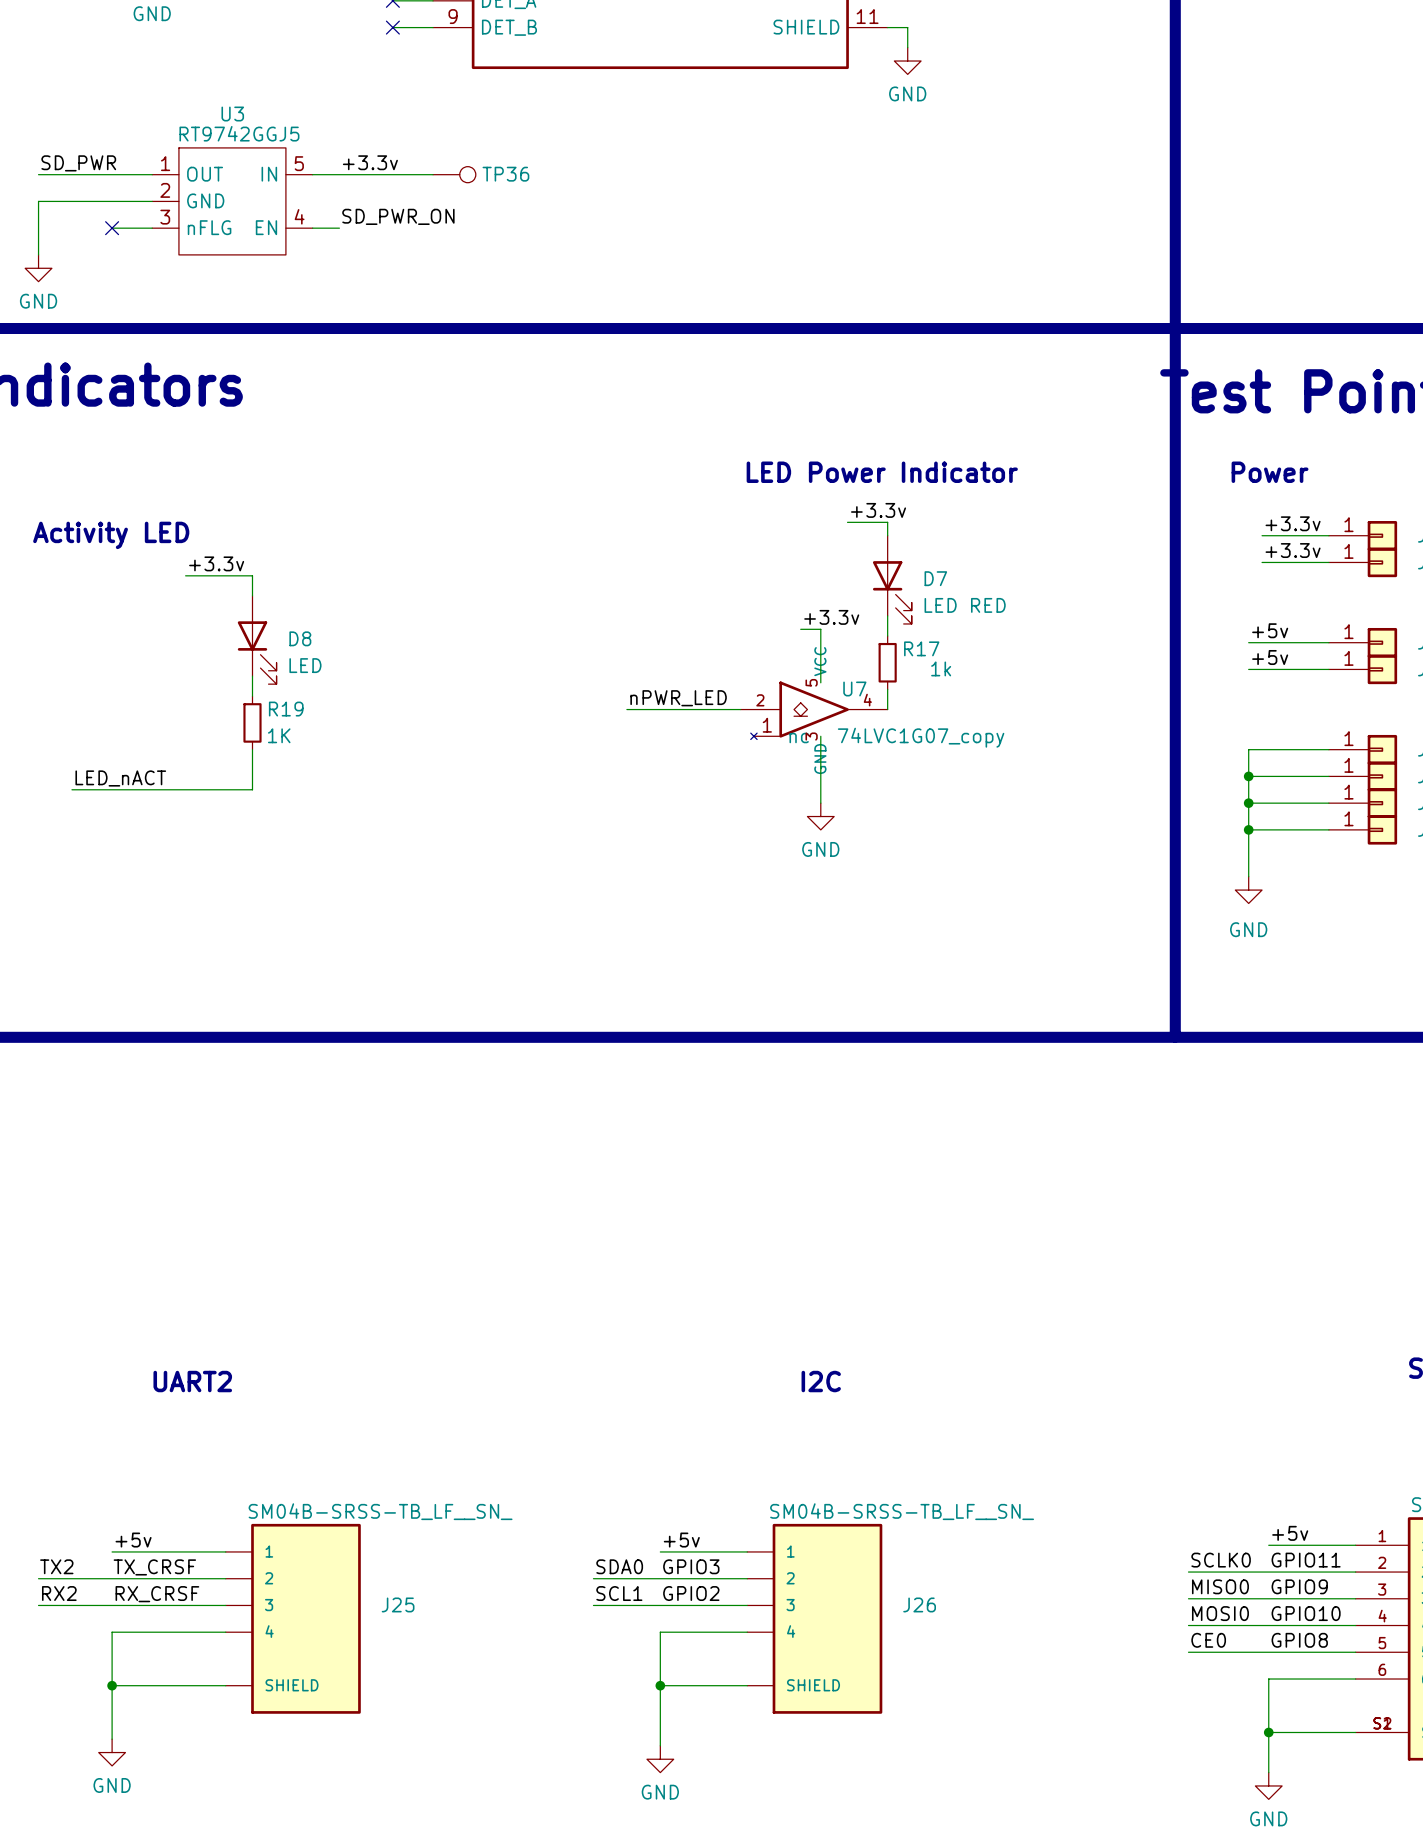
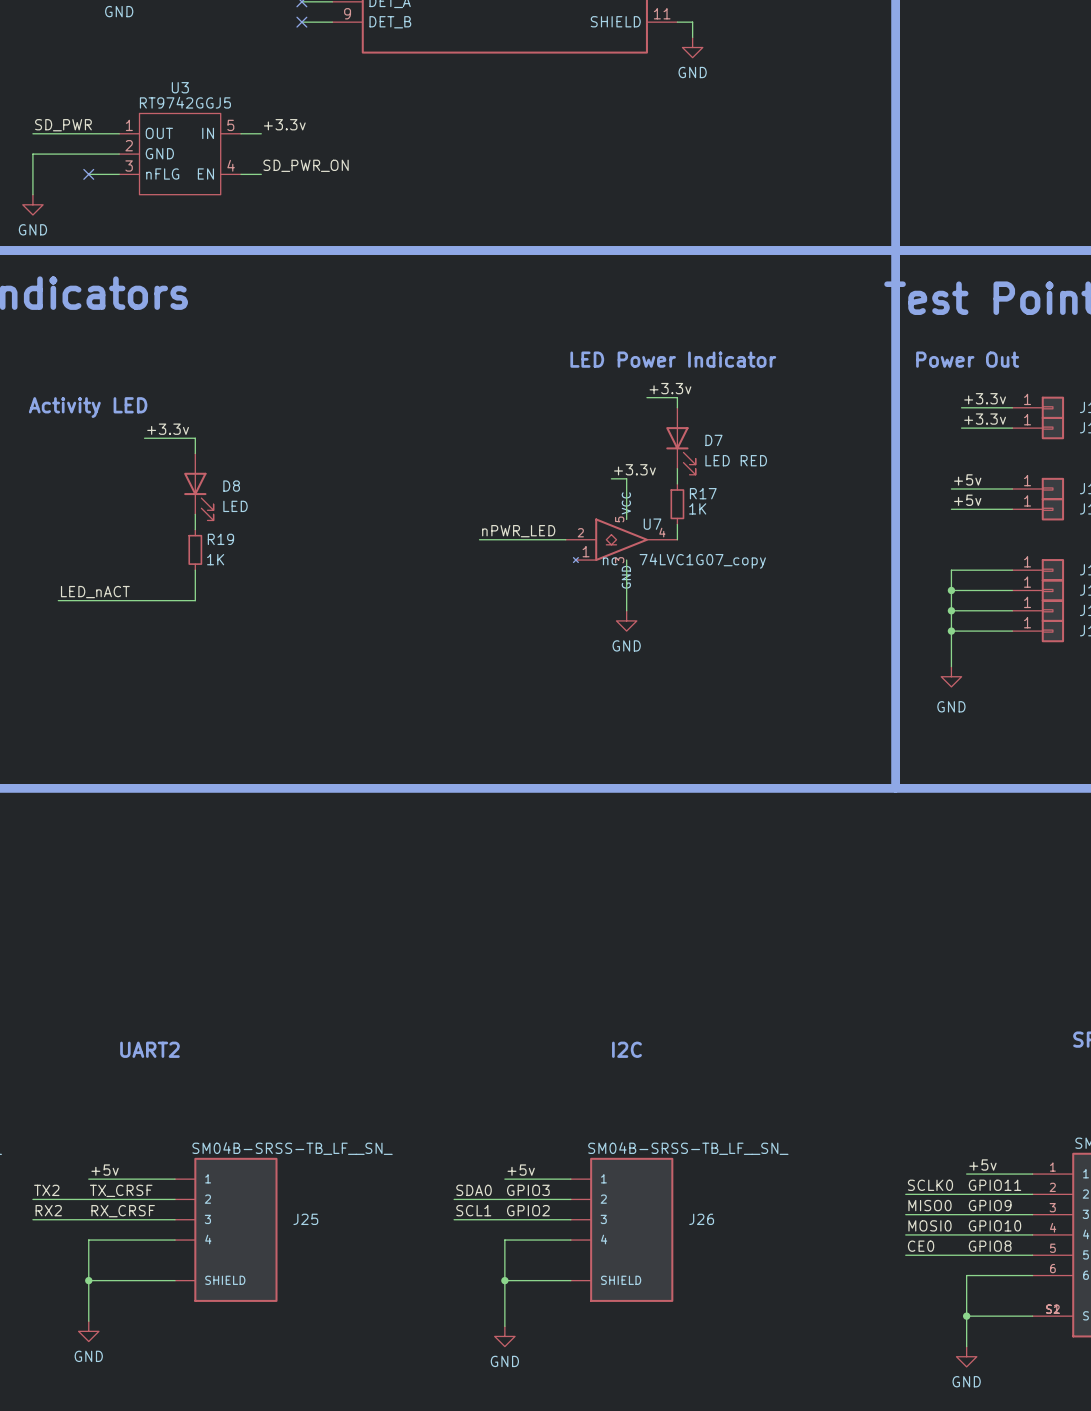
wire: (339, 174) (433, 174) -> none
TP36: (454, 174) -> none
text: Power (1270, 472) -> Power Out (967, 359)
R17 value: 1k (941, 668) -> 1K (697, 508)

